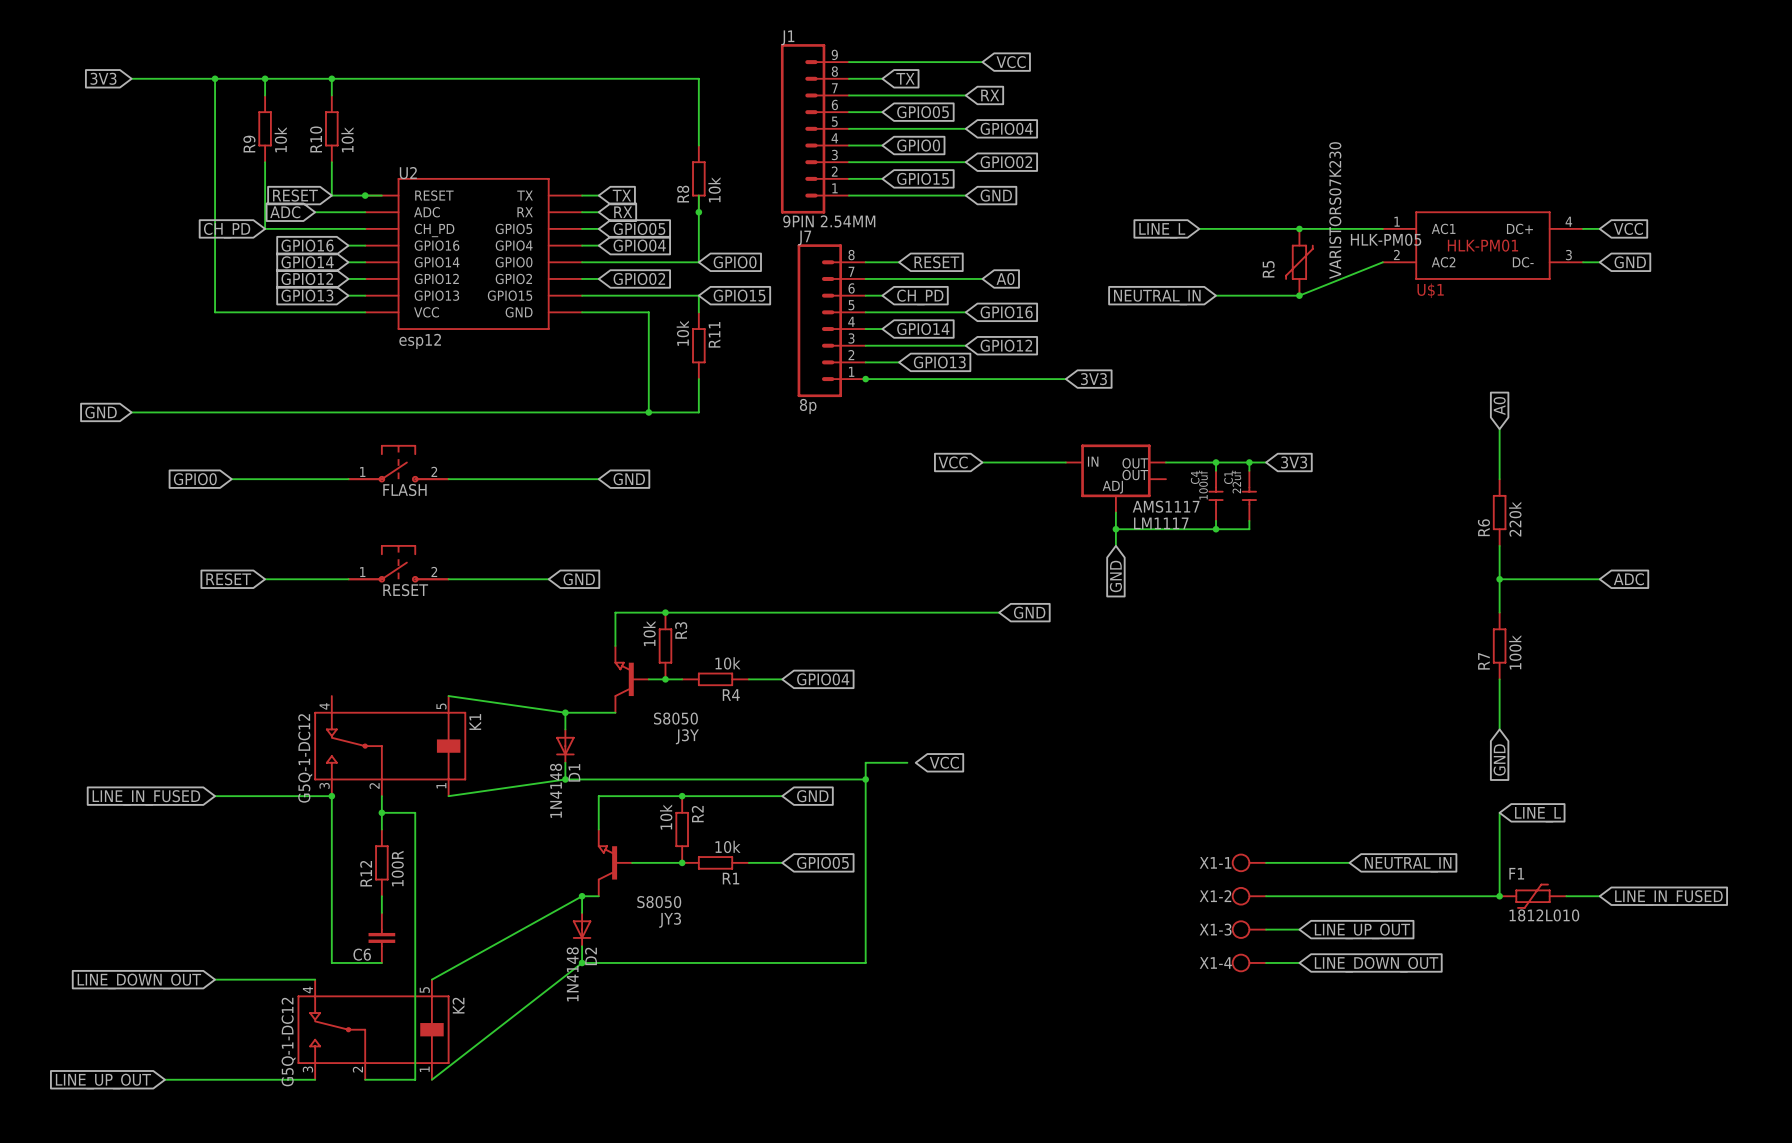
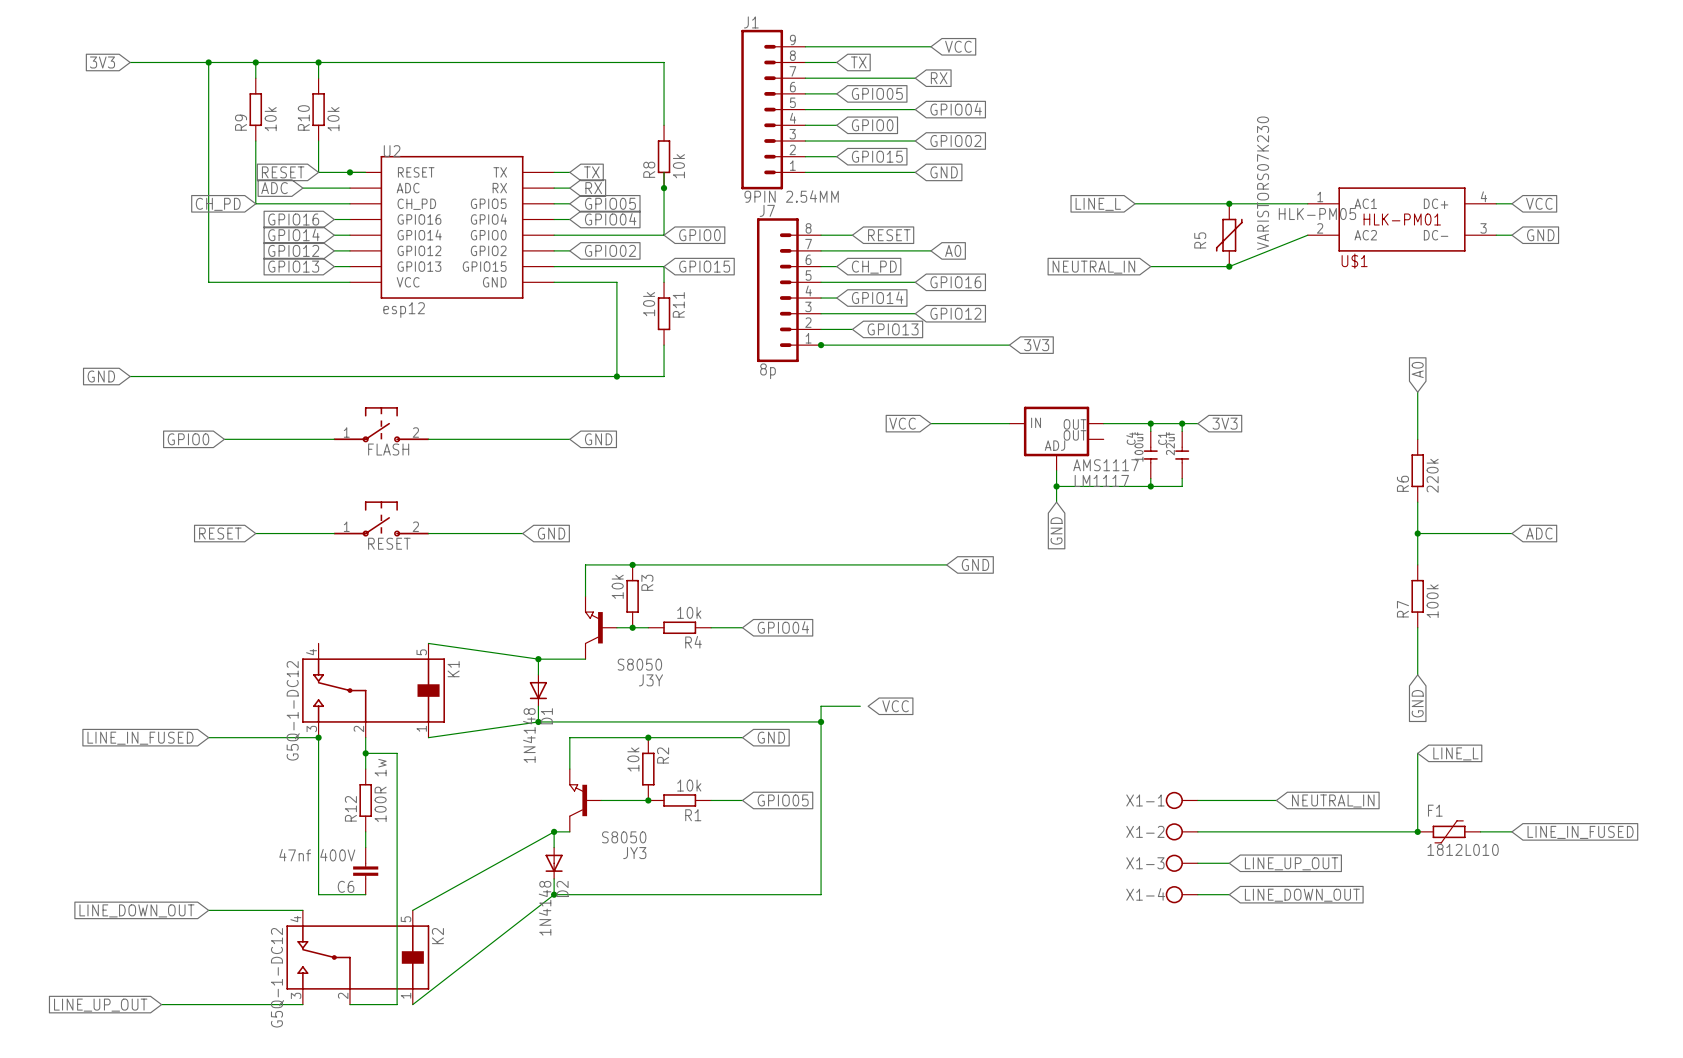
R12 value: 100R (397, 868) -> 100R 1w (380, 790)
C6 value: none -> 47nf 400V (317, 855)

